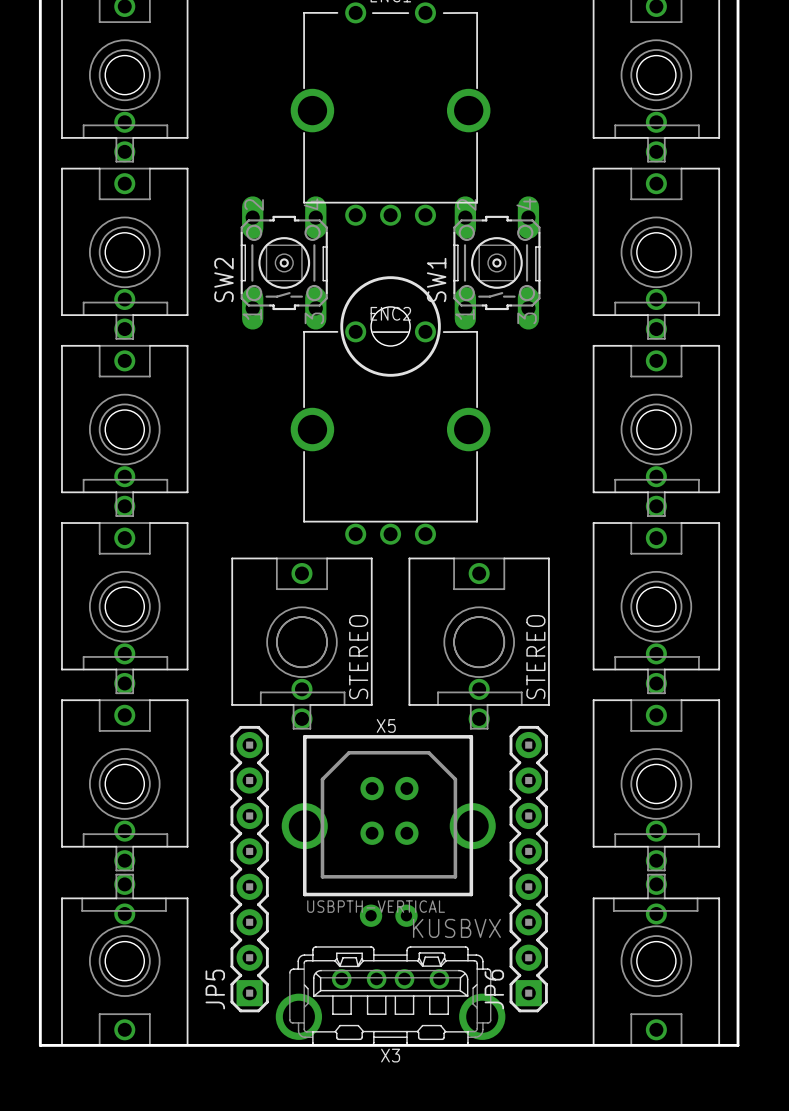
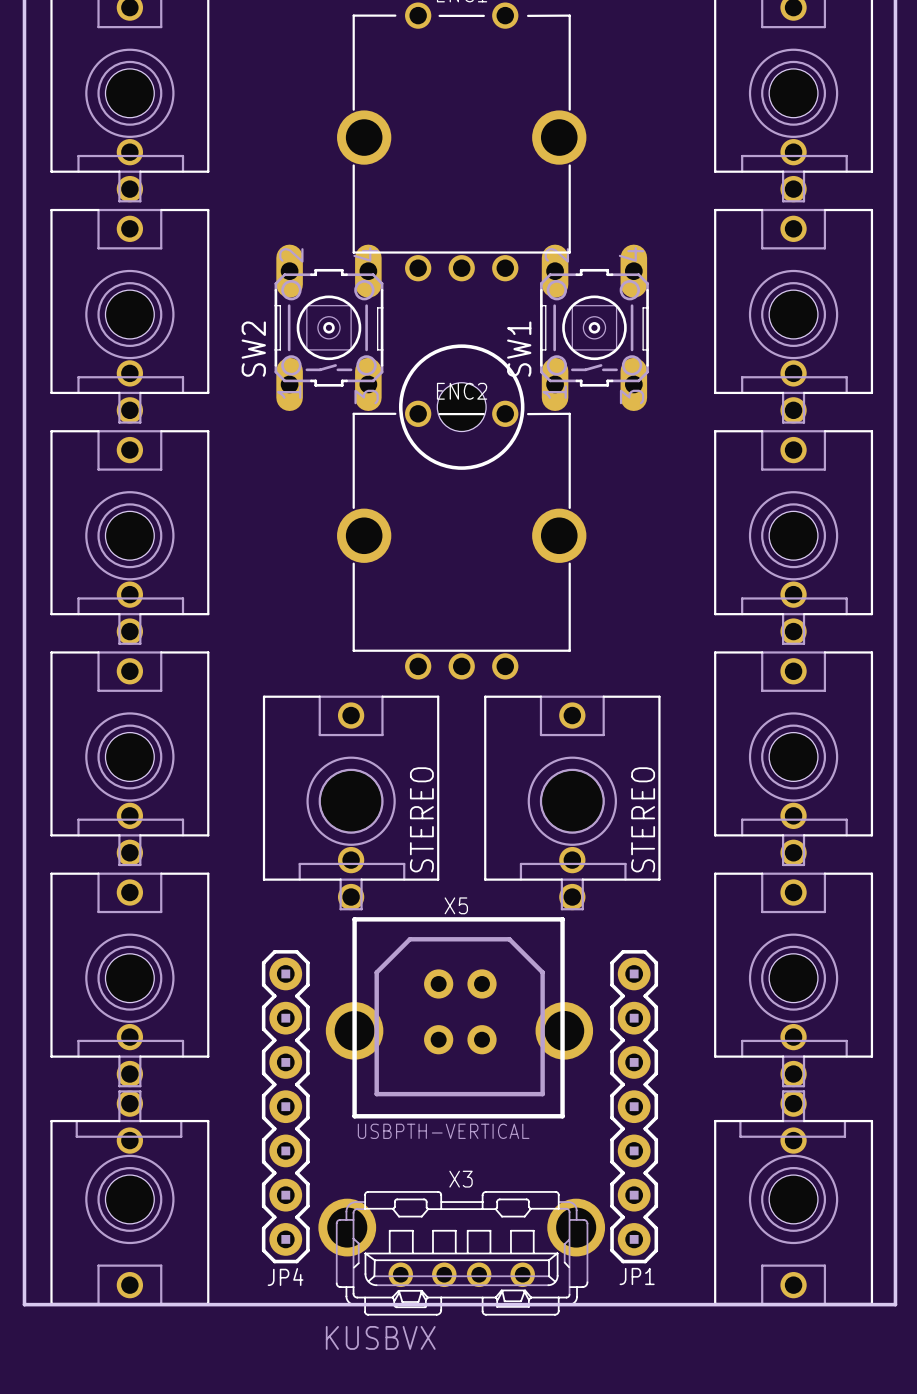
JP5: (249, 869) -> none
JP6: (528, 869) -> none
JP4: none -> (285, 1106)
JP1: none -> (634, 1106)
part: (388, 915) -> none
X3 rotation: 0° (390, 996) -> 180° (461, 1253)

